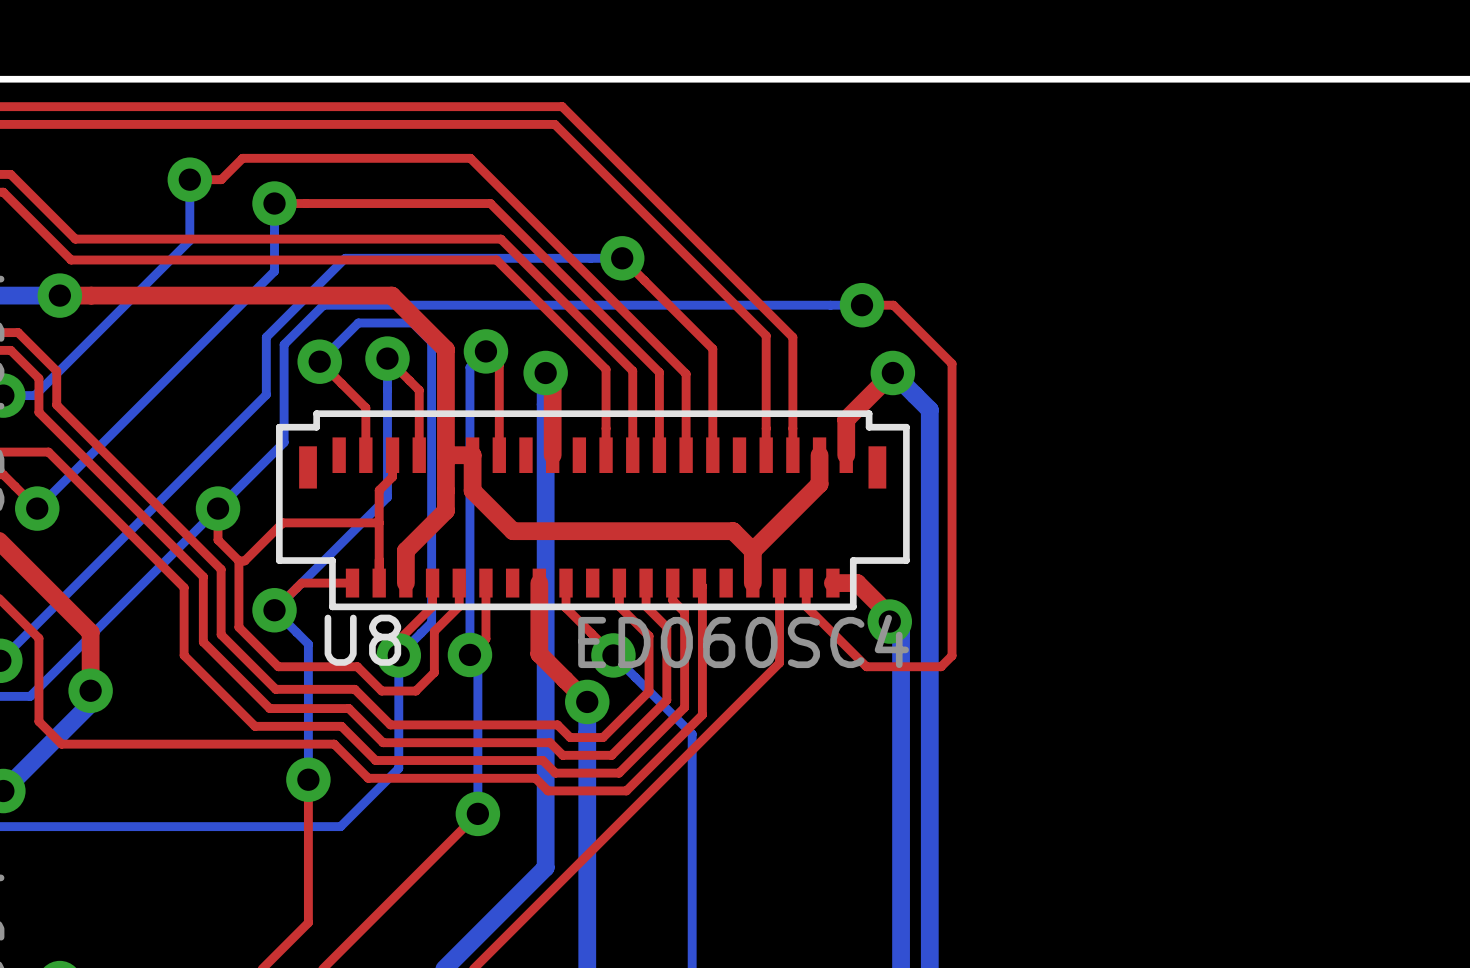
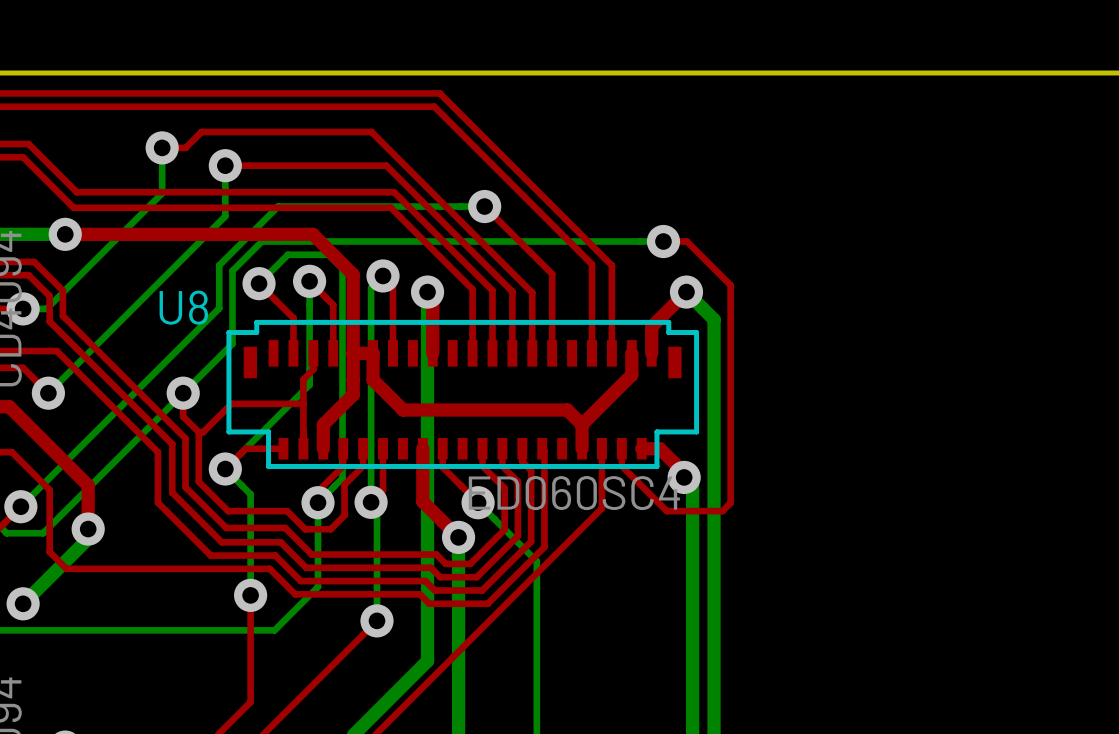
U8 name position: U8 (362, 640) -> U8 (183, 307)

